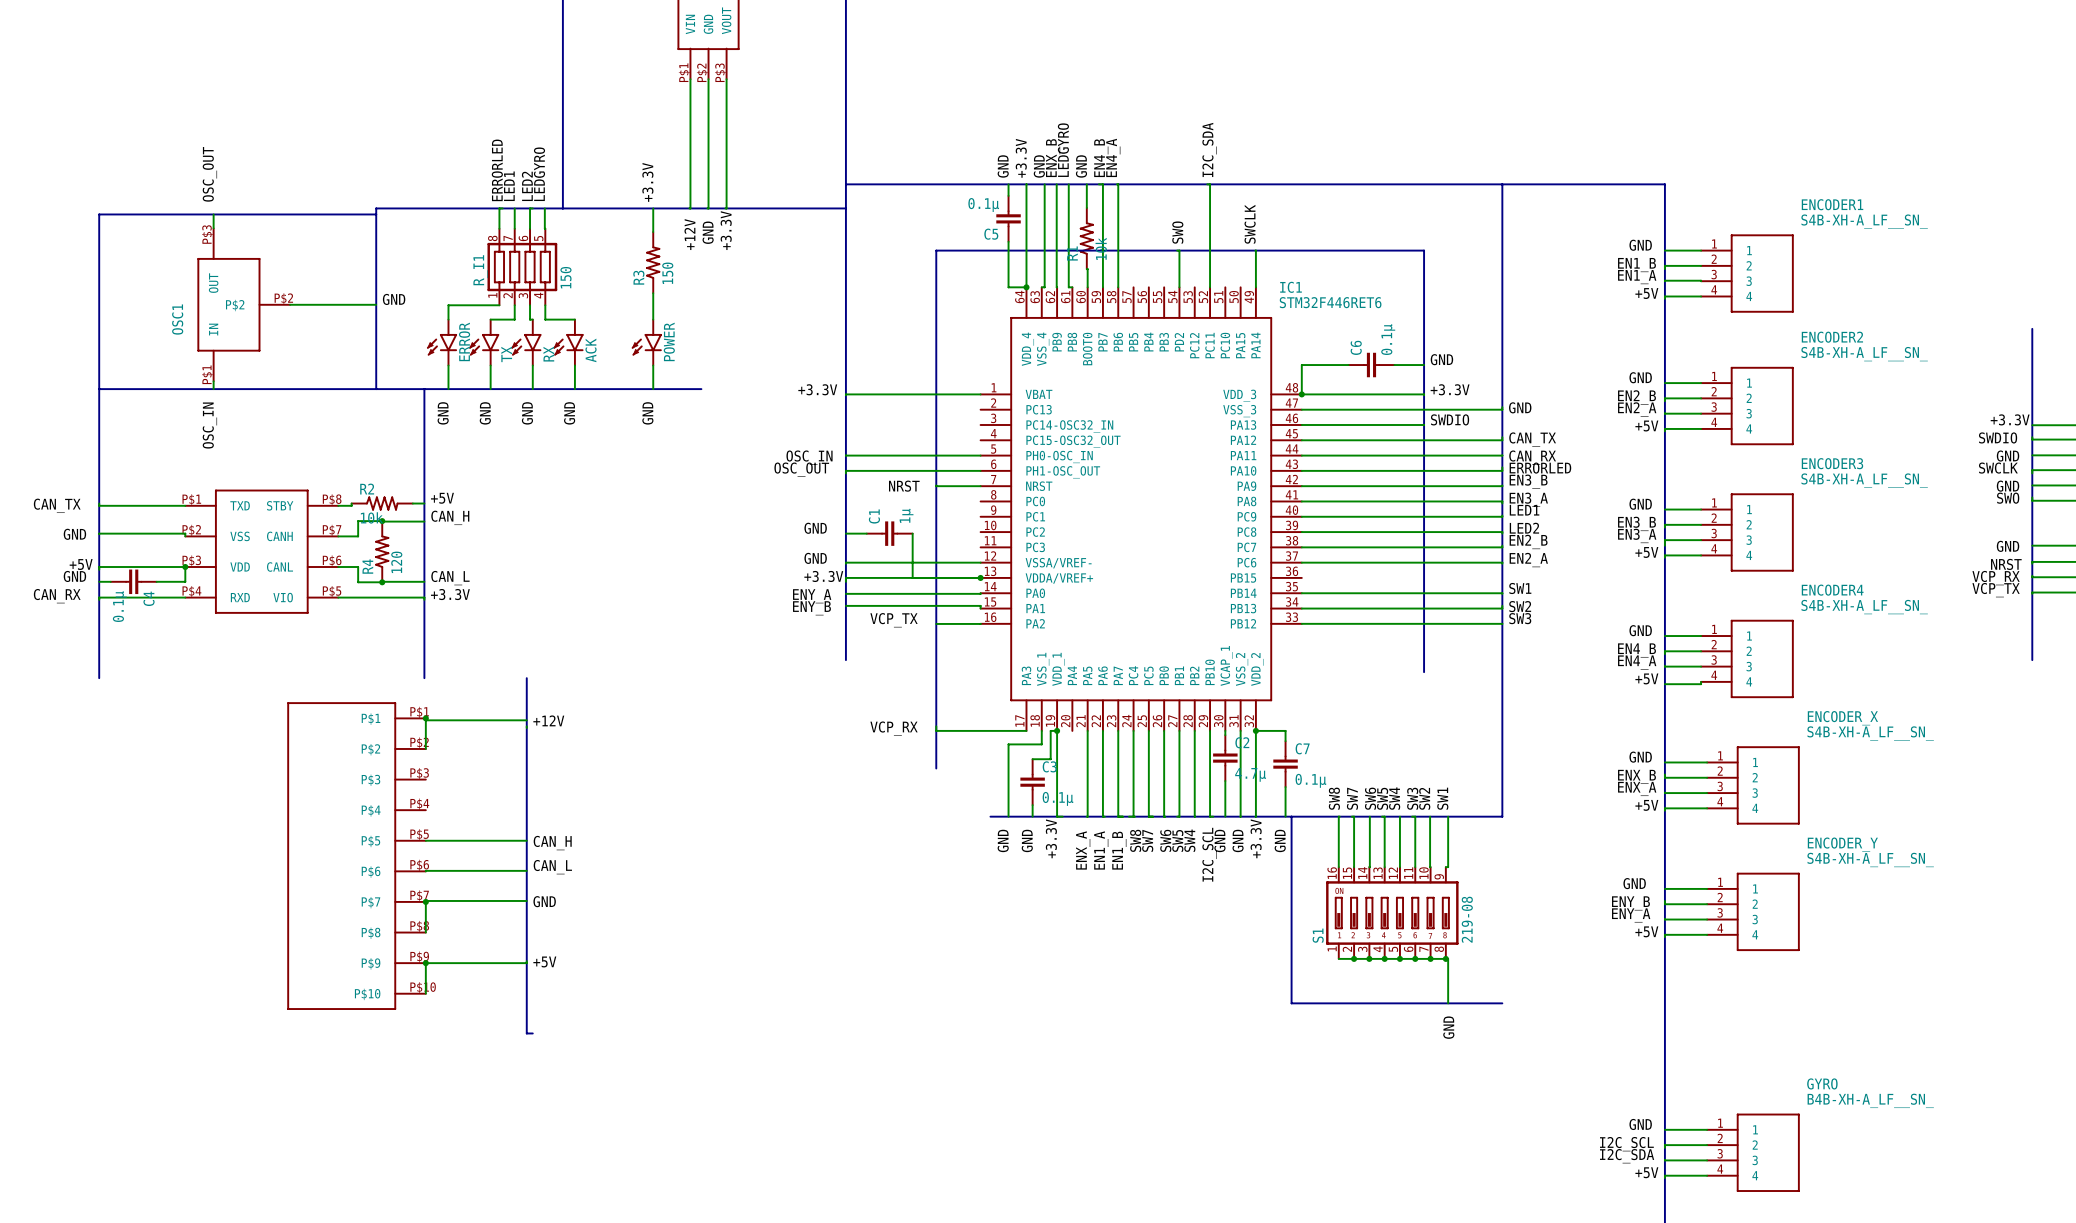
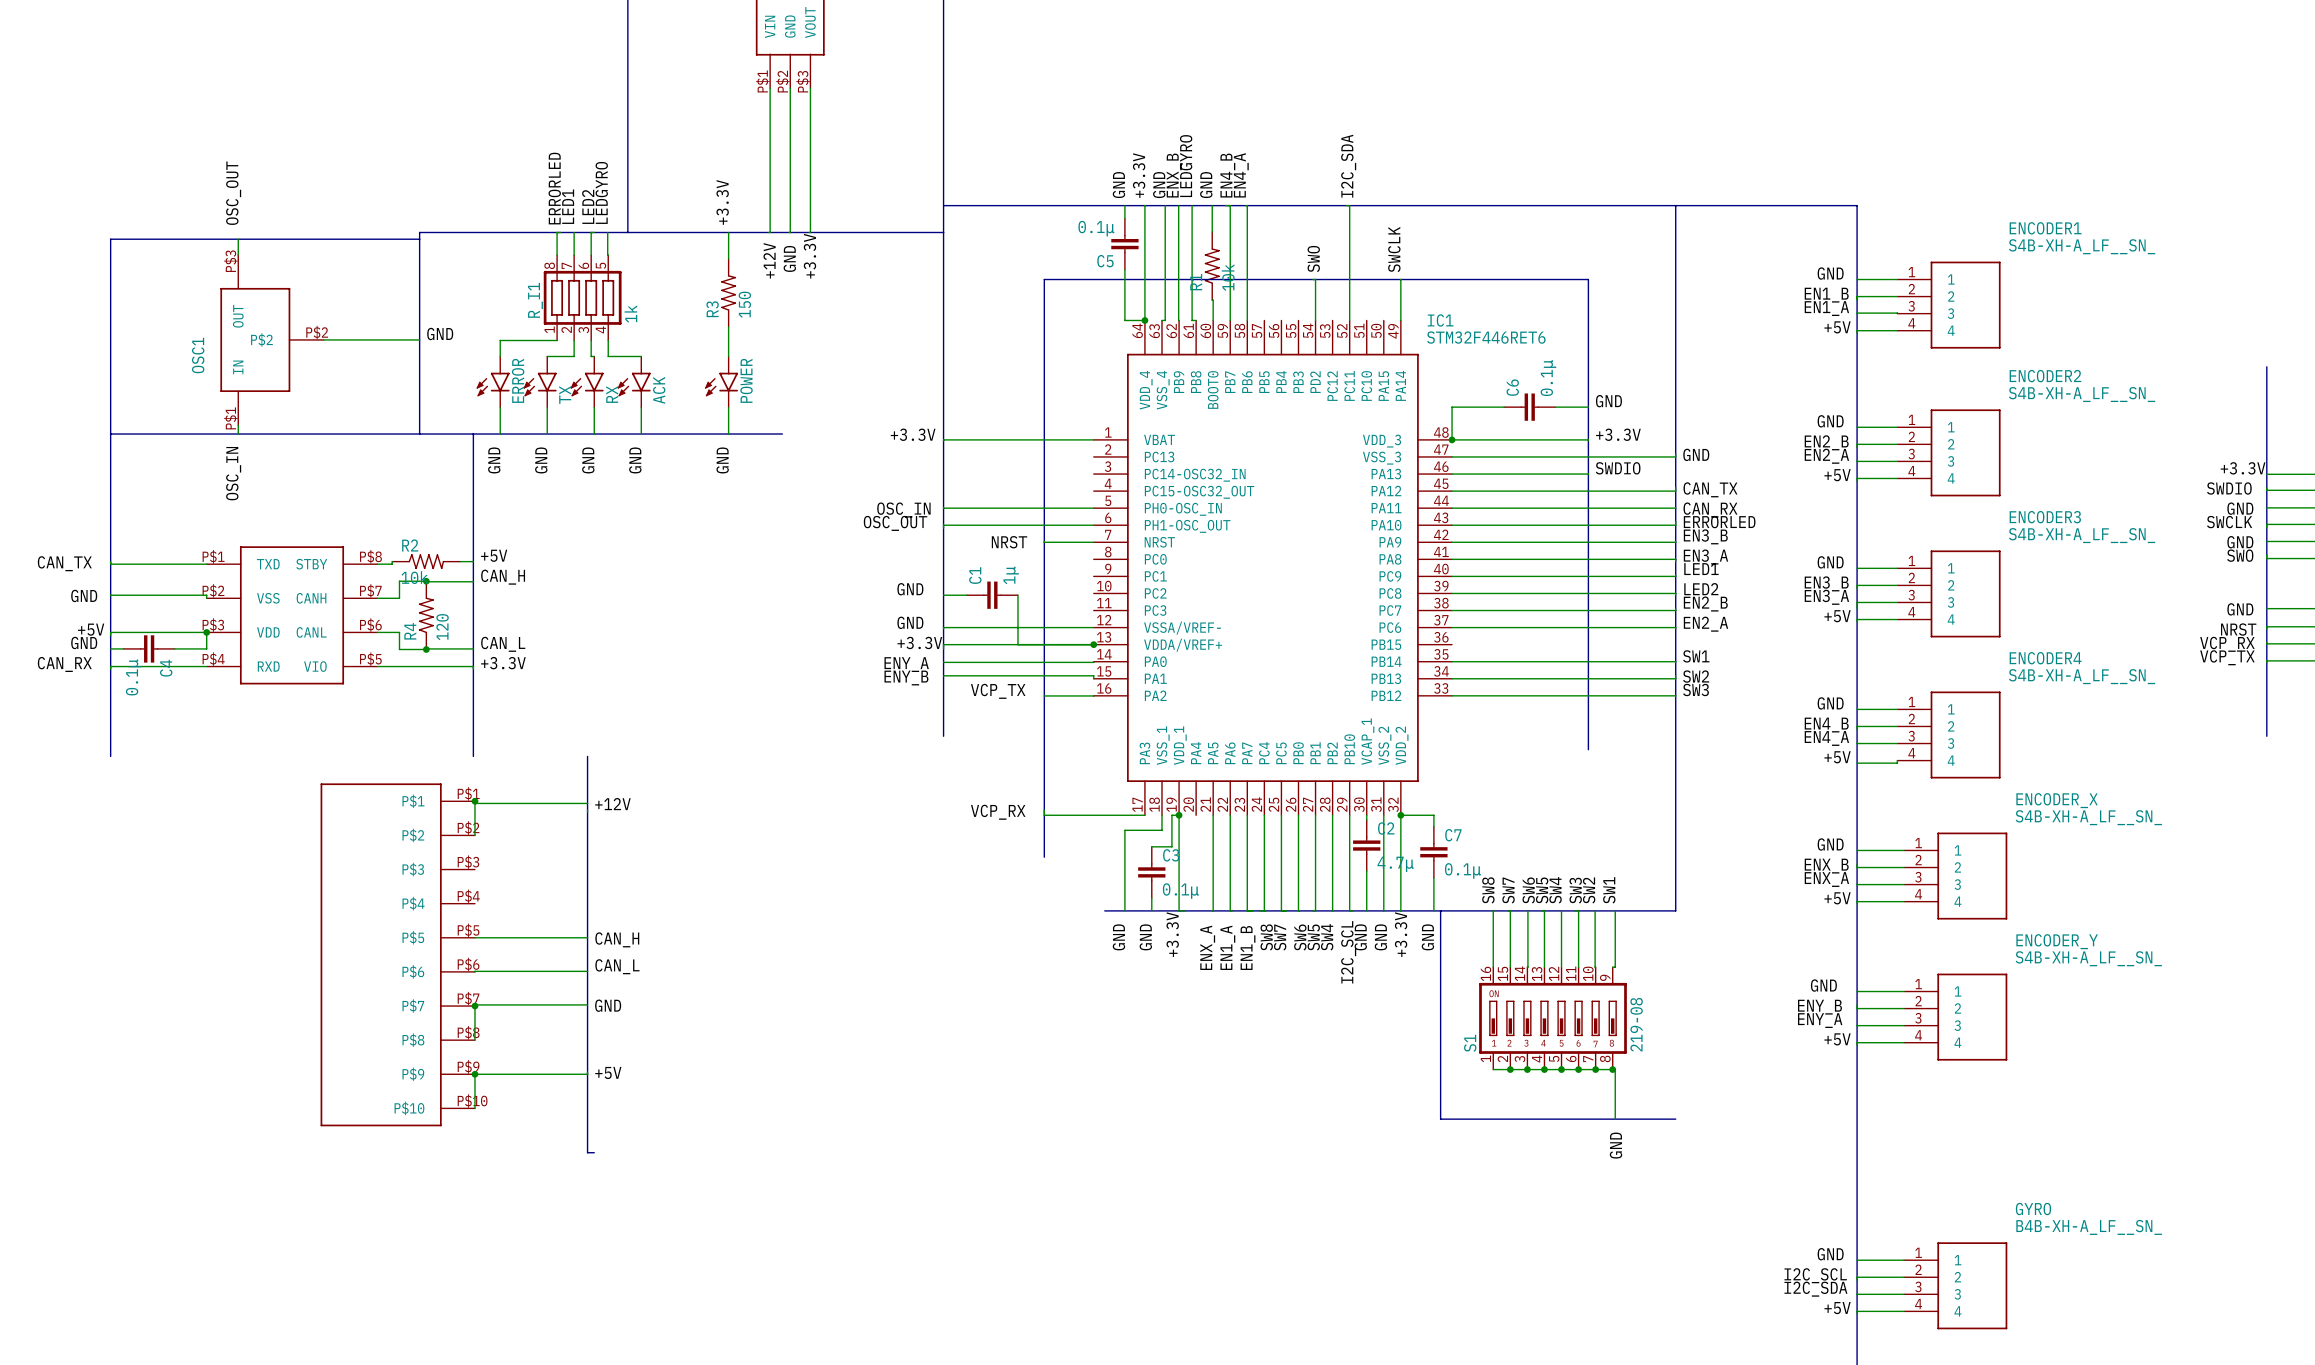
R_I1 value: 150 (565, 277) -> 1k (630, 313)

